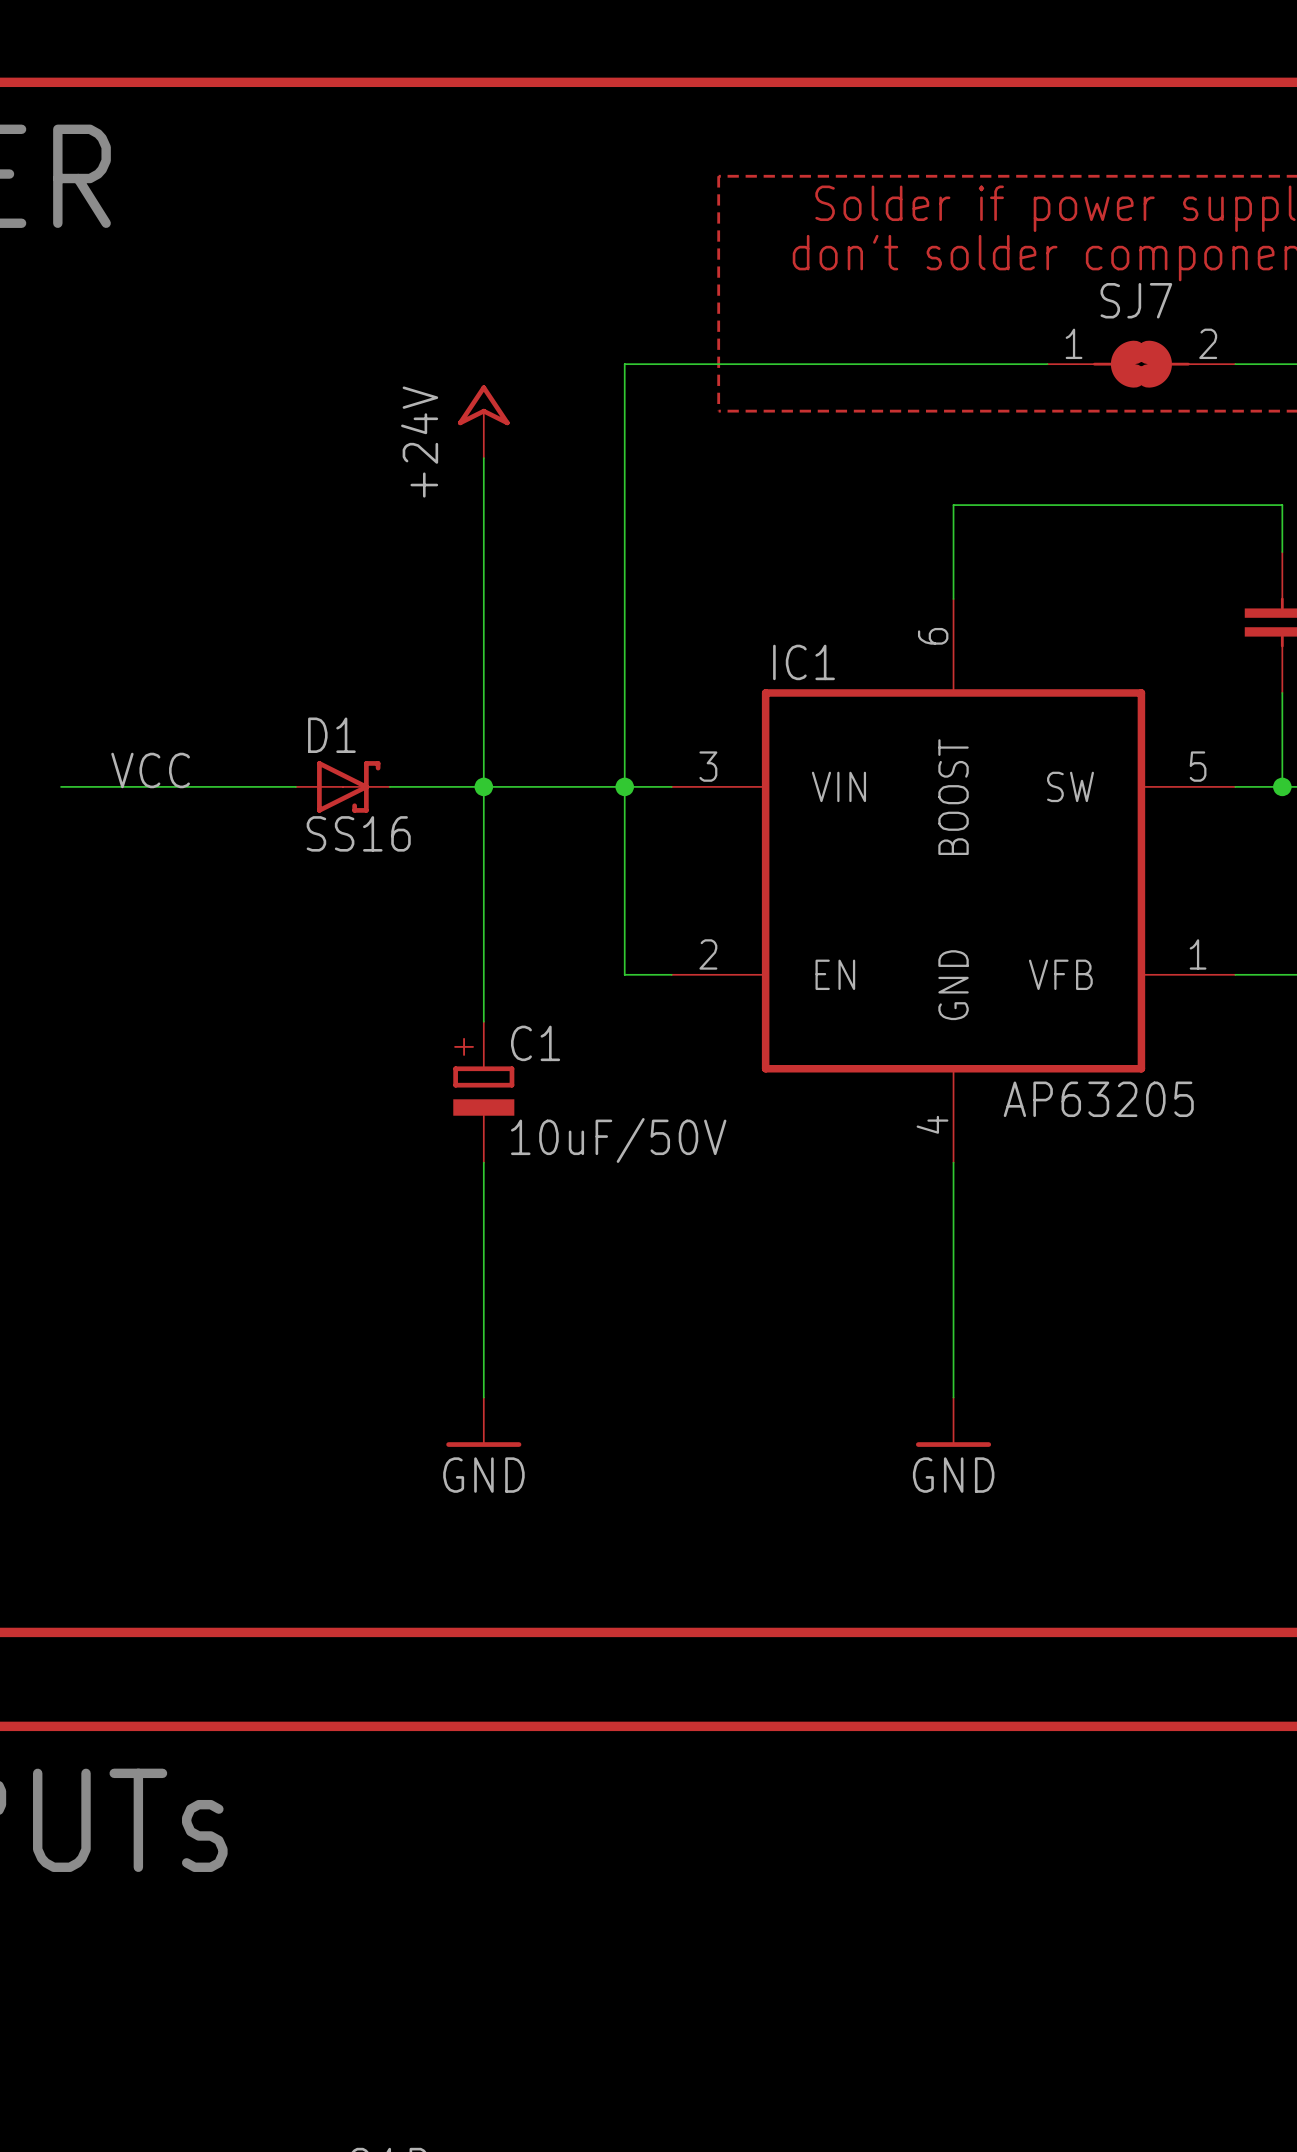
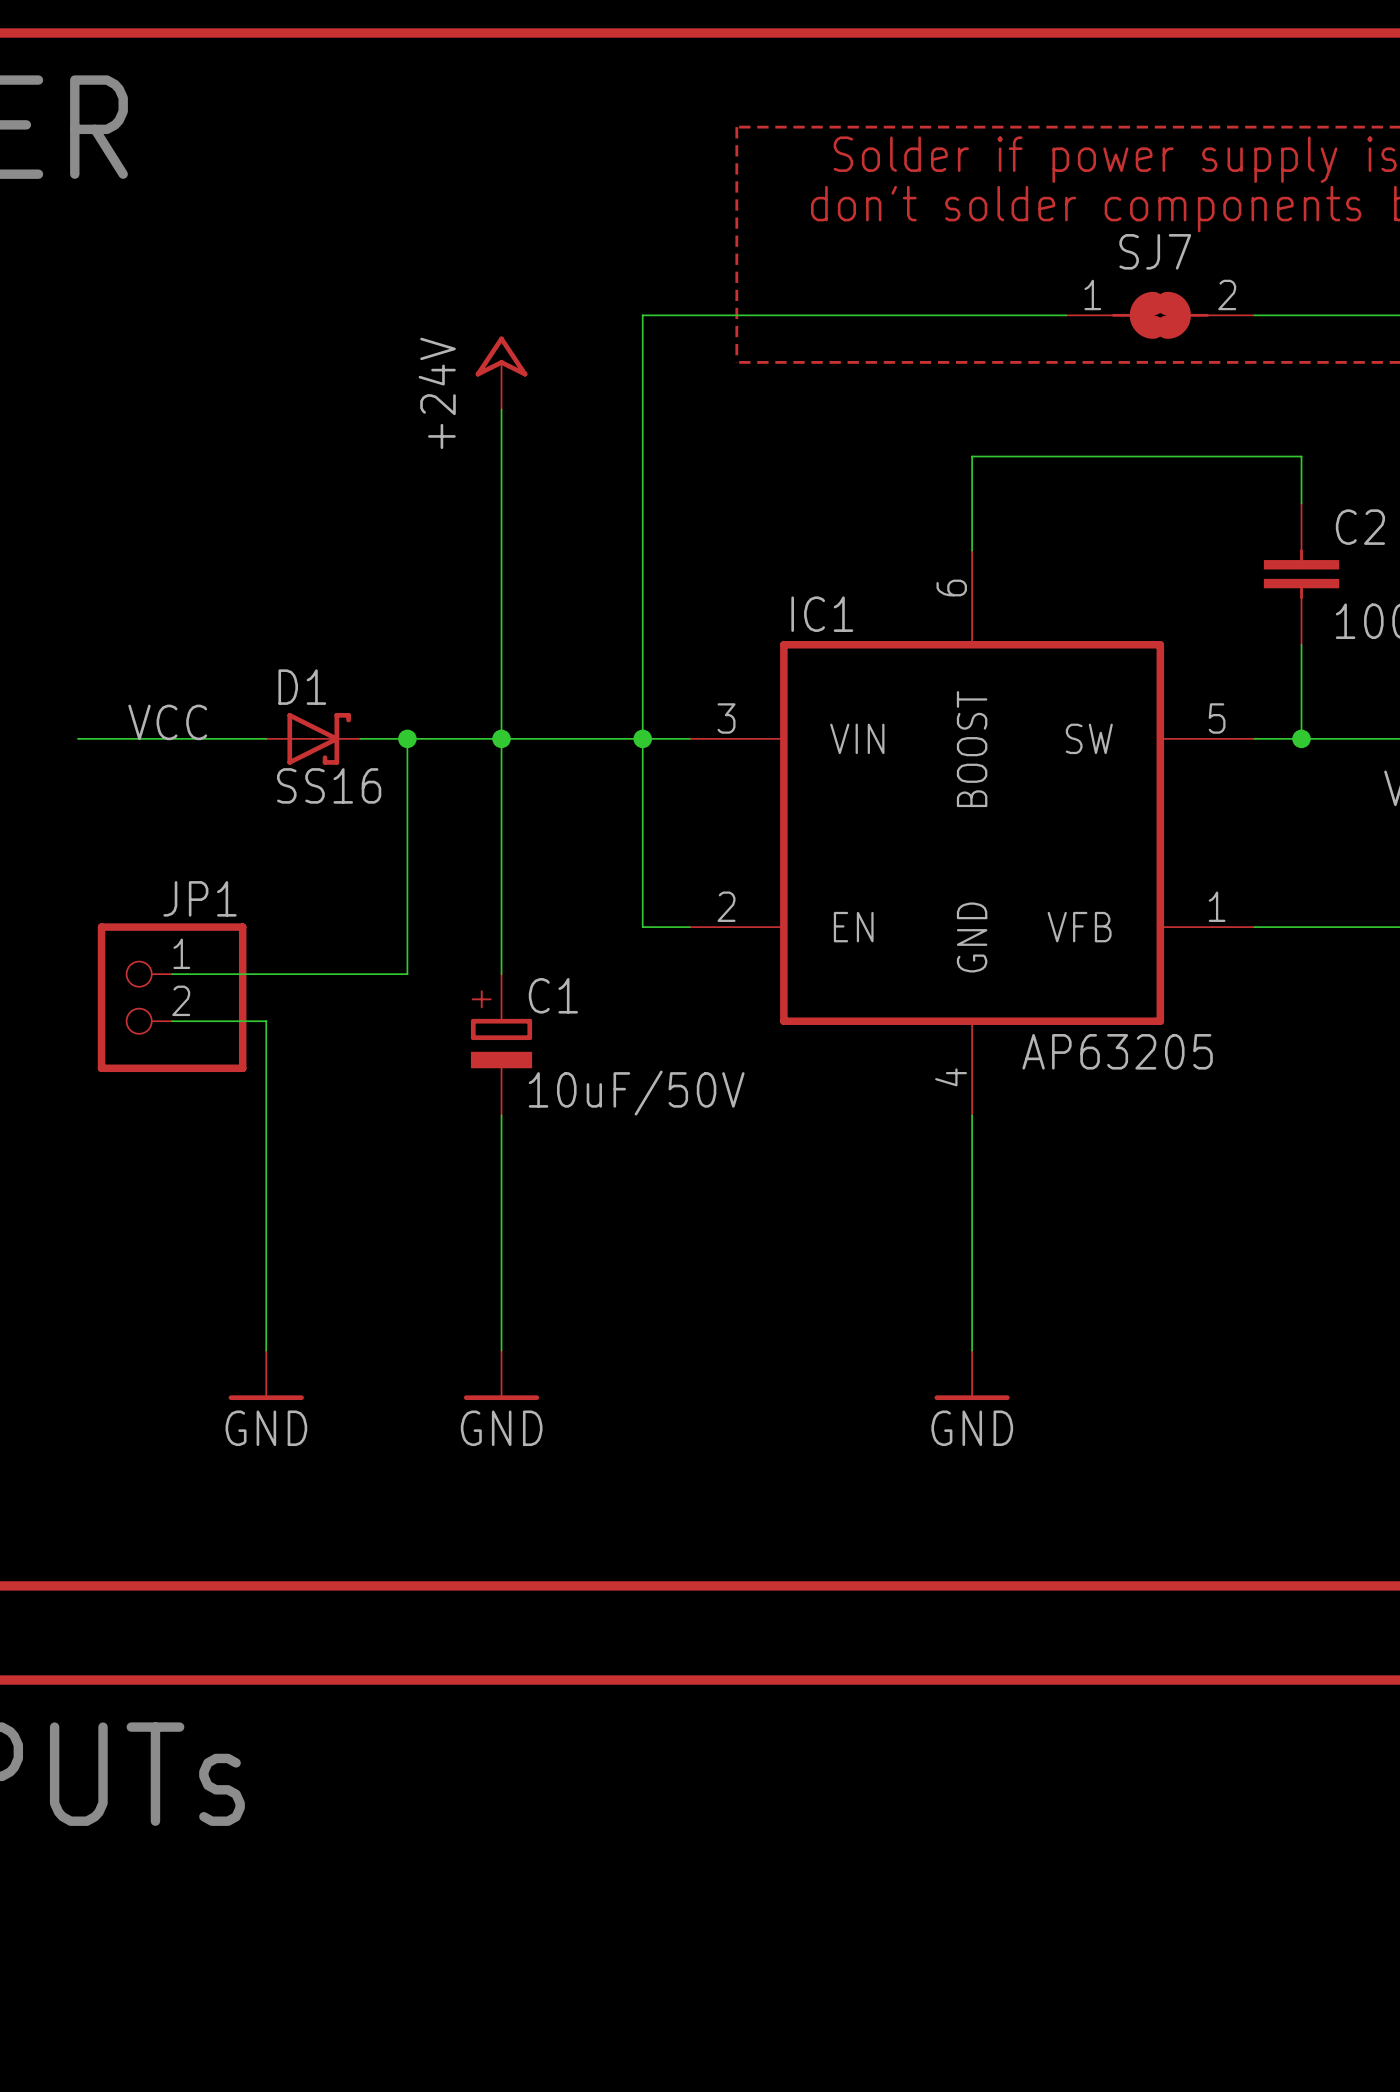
wire: none -> (360, 738) (407, 738) (407, 974) (172, 974)
D1 position: (342, 786) -> (313, 738)
junction: none -> (407, 738)
JP1: none -> (172, 997)
wire: none -> (172, 1021) (266, 1021) (266, 1350)
power symbol: none -> GND (266, 1375)

